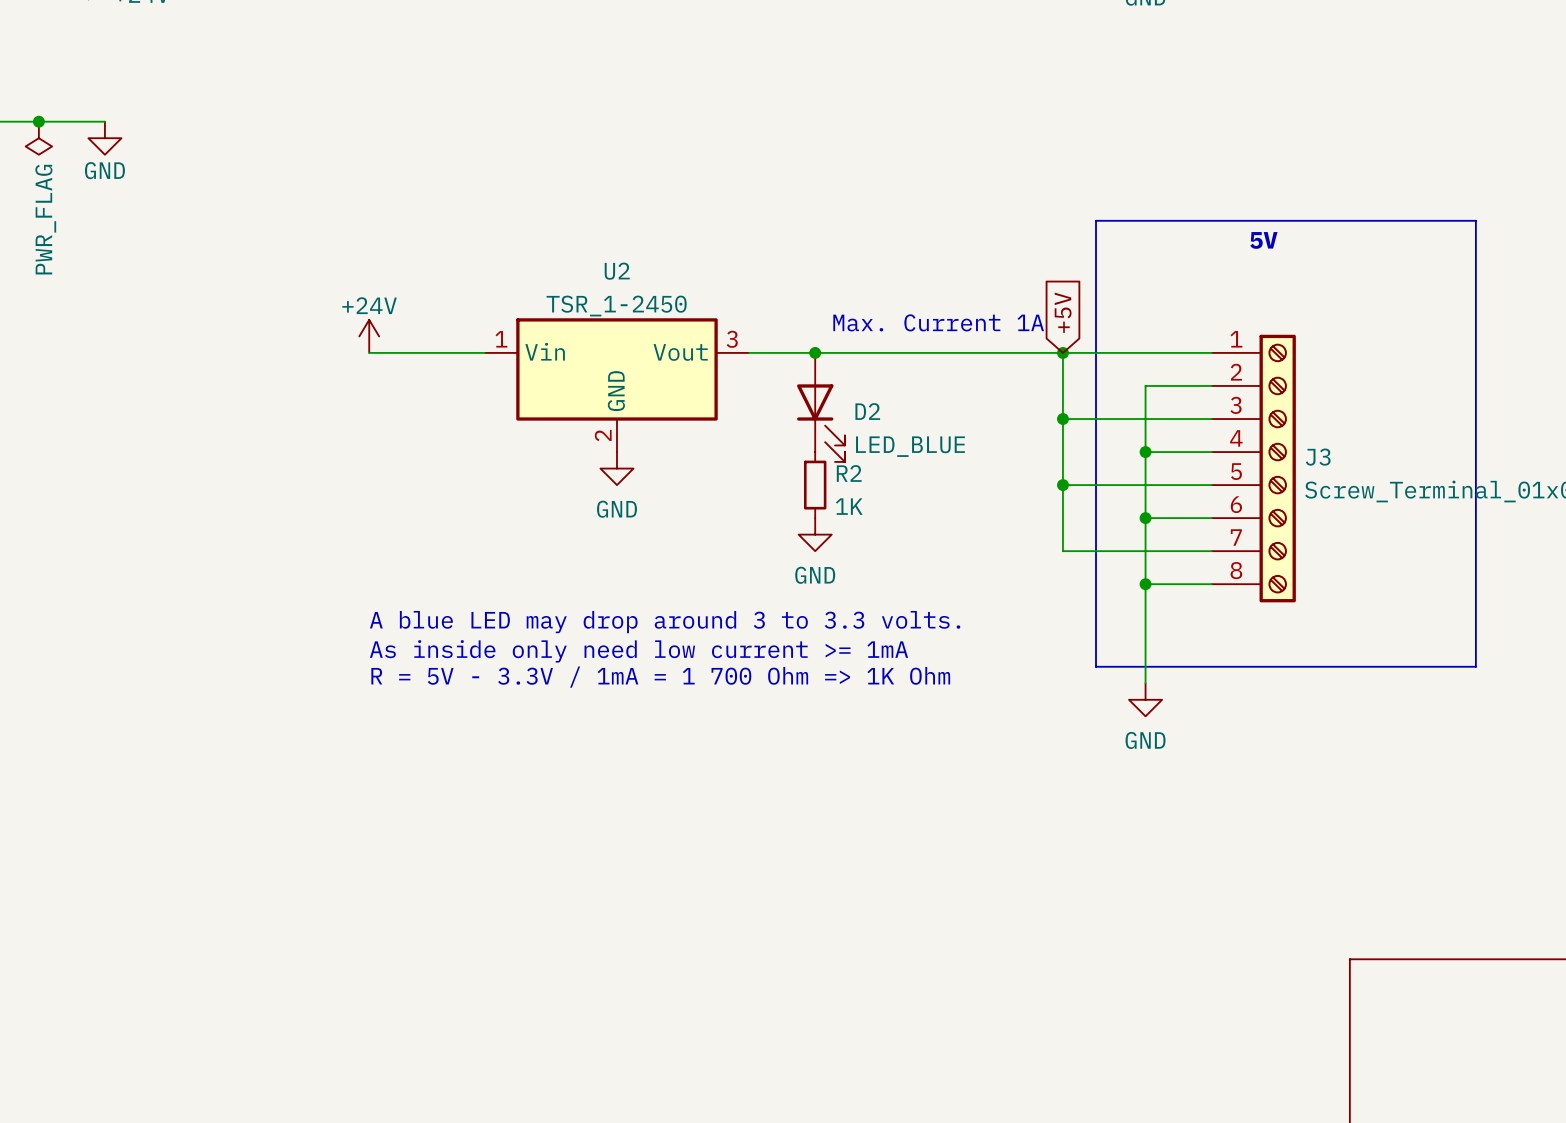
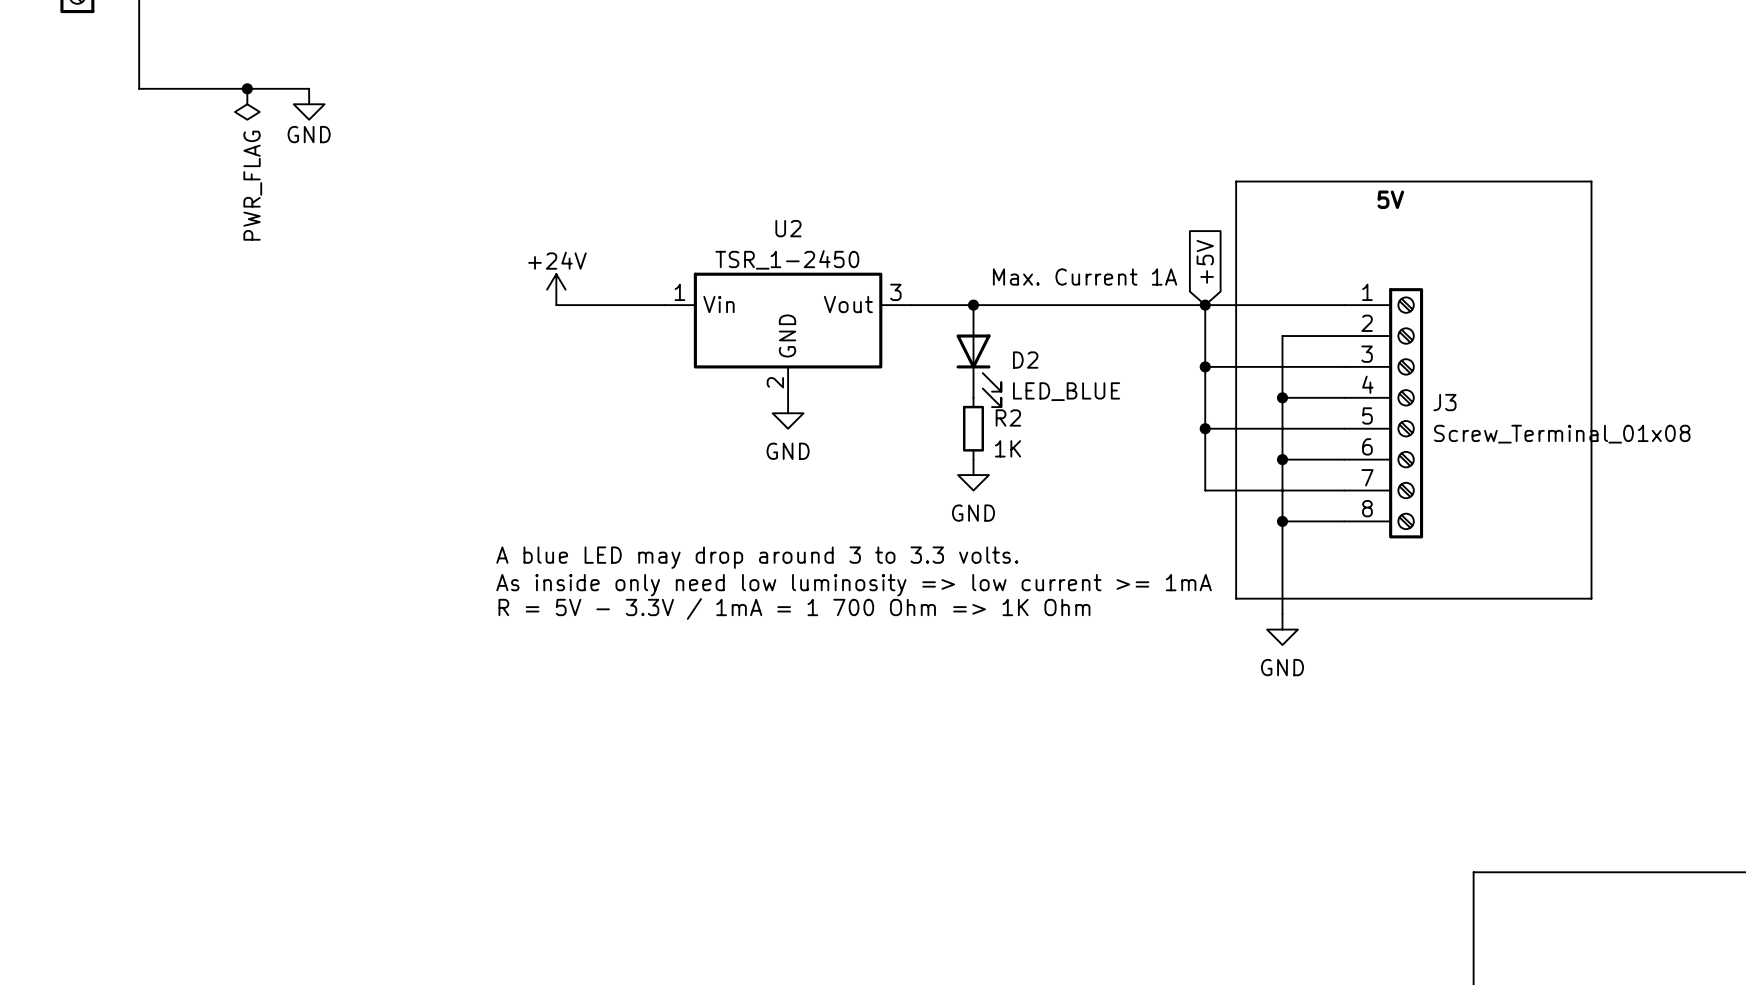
text position: A blue LED may drop around 3 to 3.3 volts. (665, 622) -> A blue LED may drop around 3 to 3.3 volts. (757, 557)
text: As inside only need low current >= 1mA (639, 651) -> As inside only need low luminosity => low current >= 1mA (854, 585)
text position: R = 5V - 3.3V / 1mA = 1 700 Ohm => 1K Ohm (660, 677) -> R = 5V - 3.3V / 1mA = 1 700 Ohm => 1K Ohm (794, 608)

